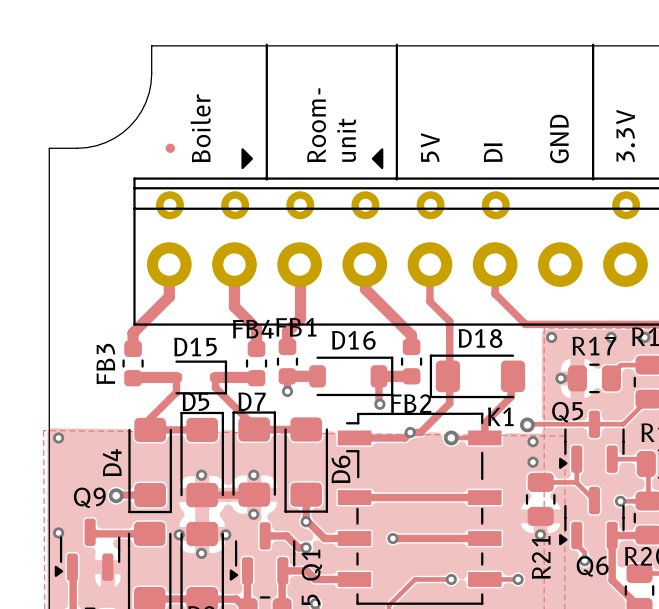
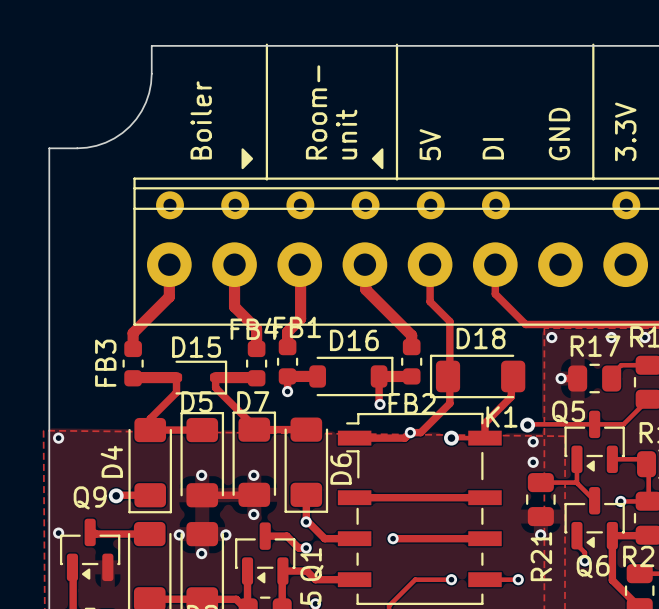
part: (170, 148) -> none
Q5 footprint: [559, 410, 625, 473] -> [564, 410, 625, 474]
Q6 footprint: [559, 486, 625, 550] -> [564, 487, 625, 550]
Q9 footprint: [54, 518, 121, 581] -> [59, 518, 121, 582]
Q1 footprint: [229, 522, 296, 585] -> [235, 522, 296, 585]

